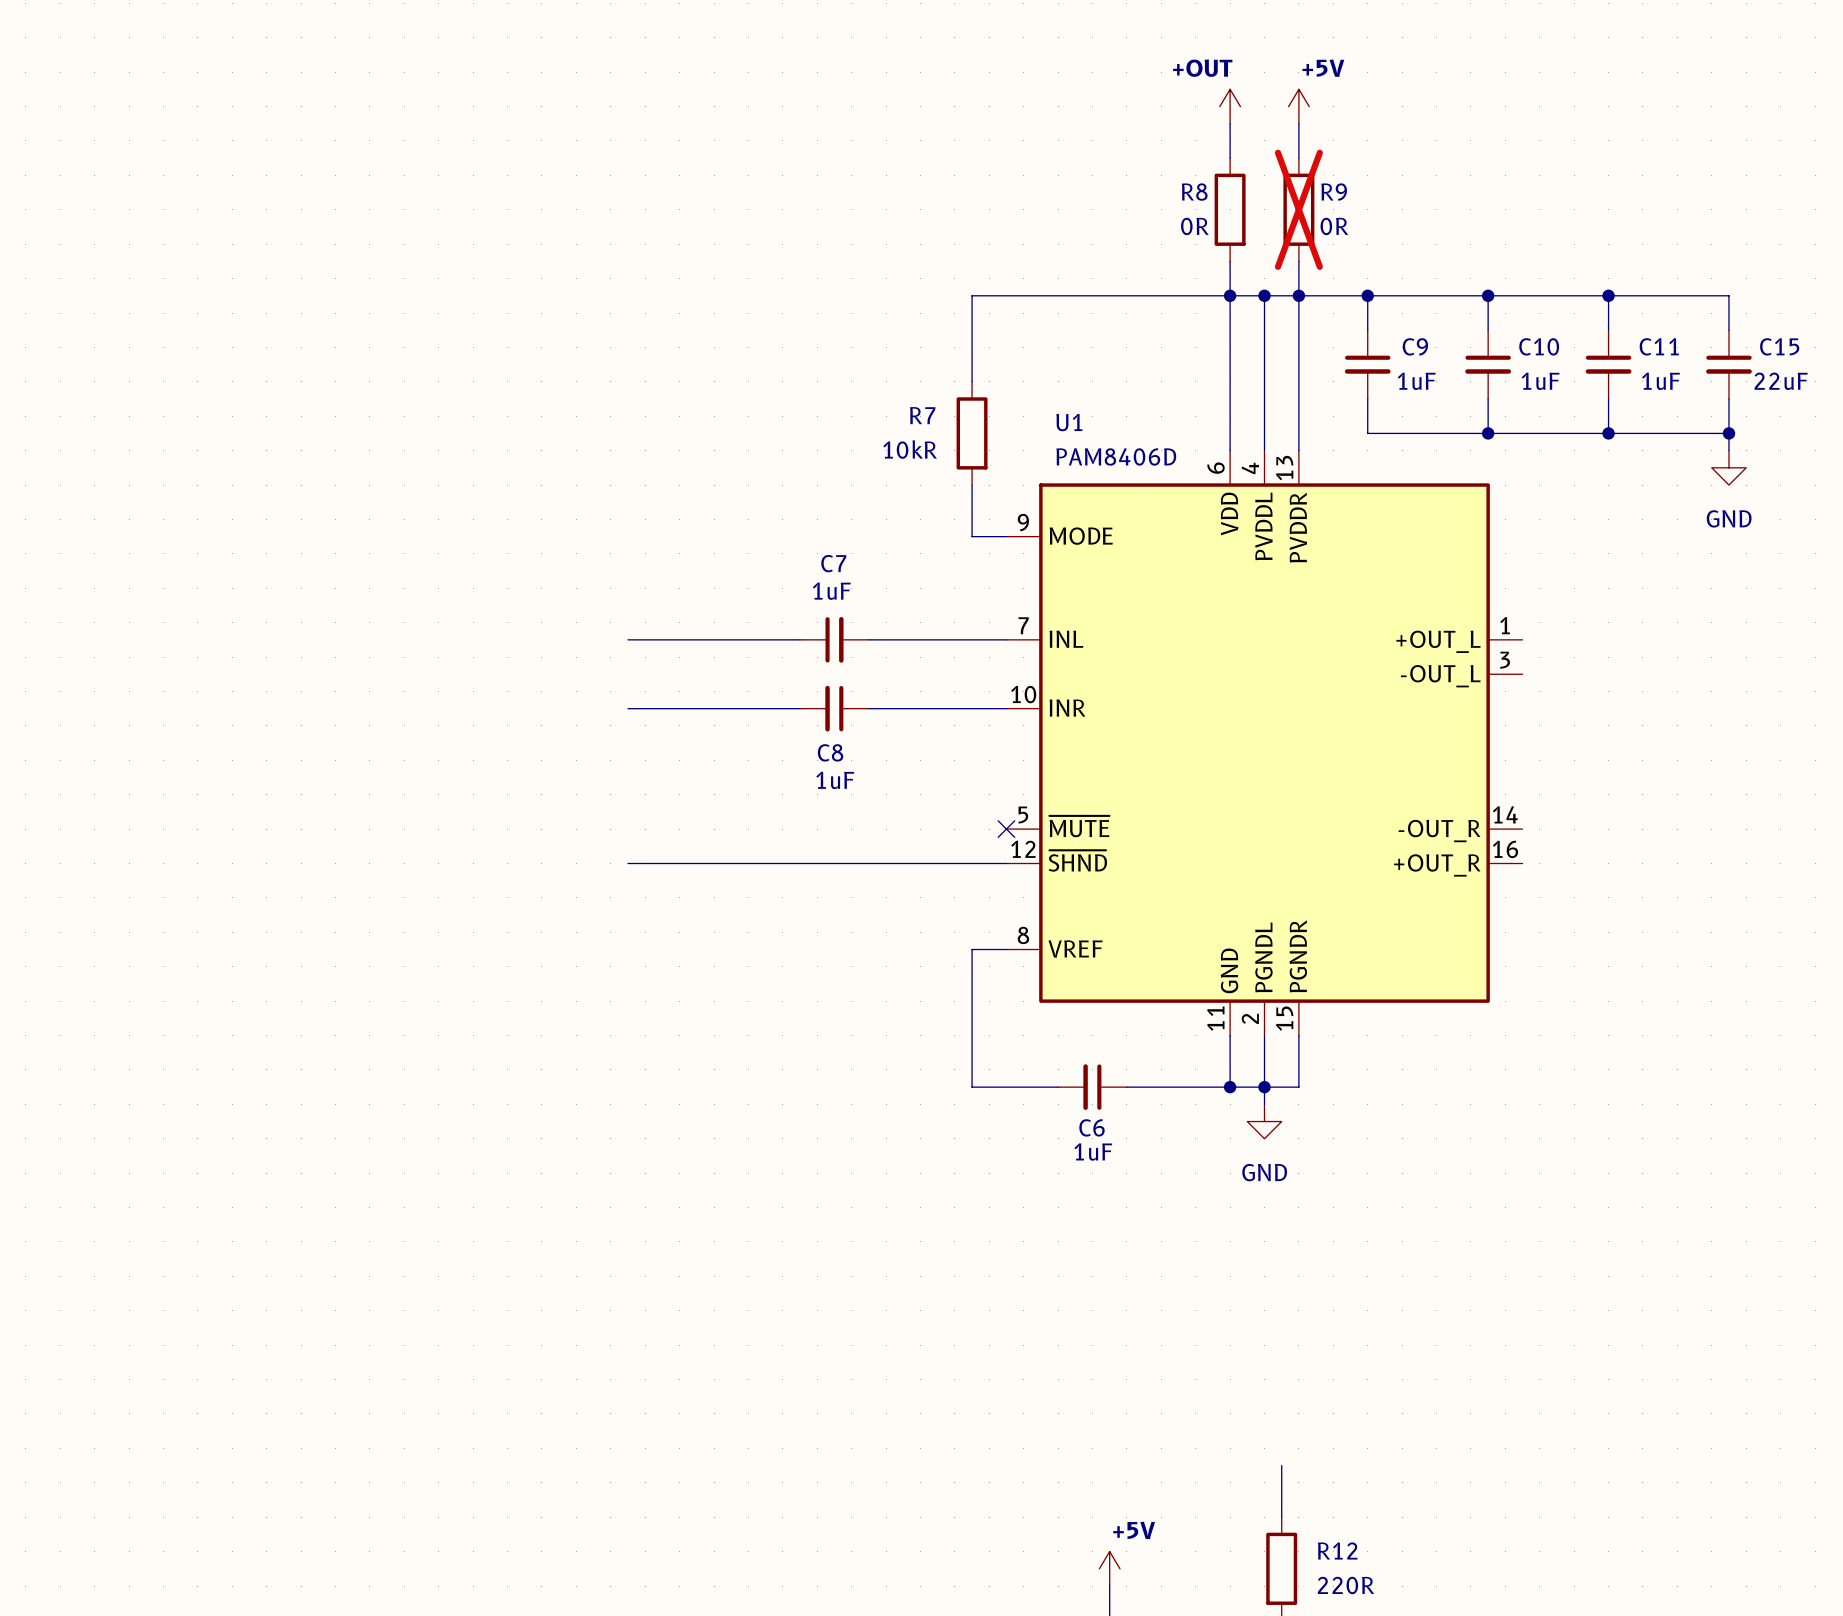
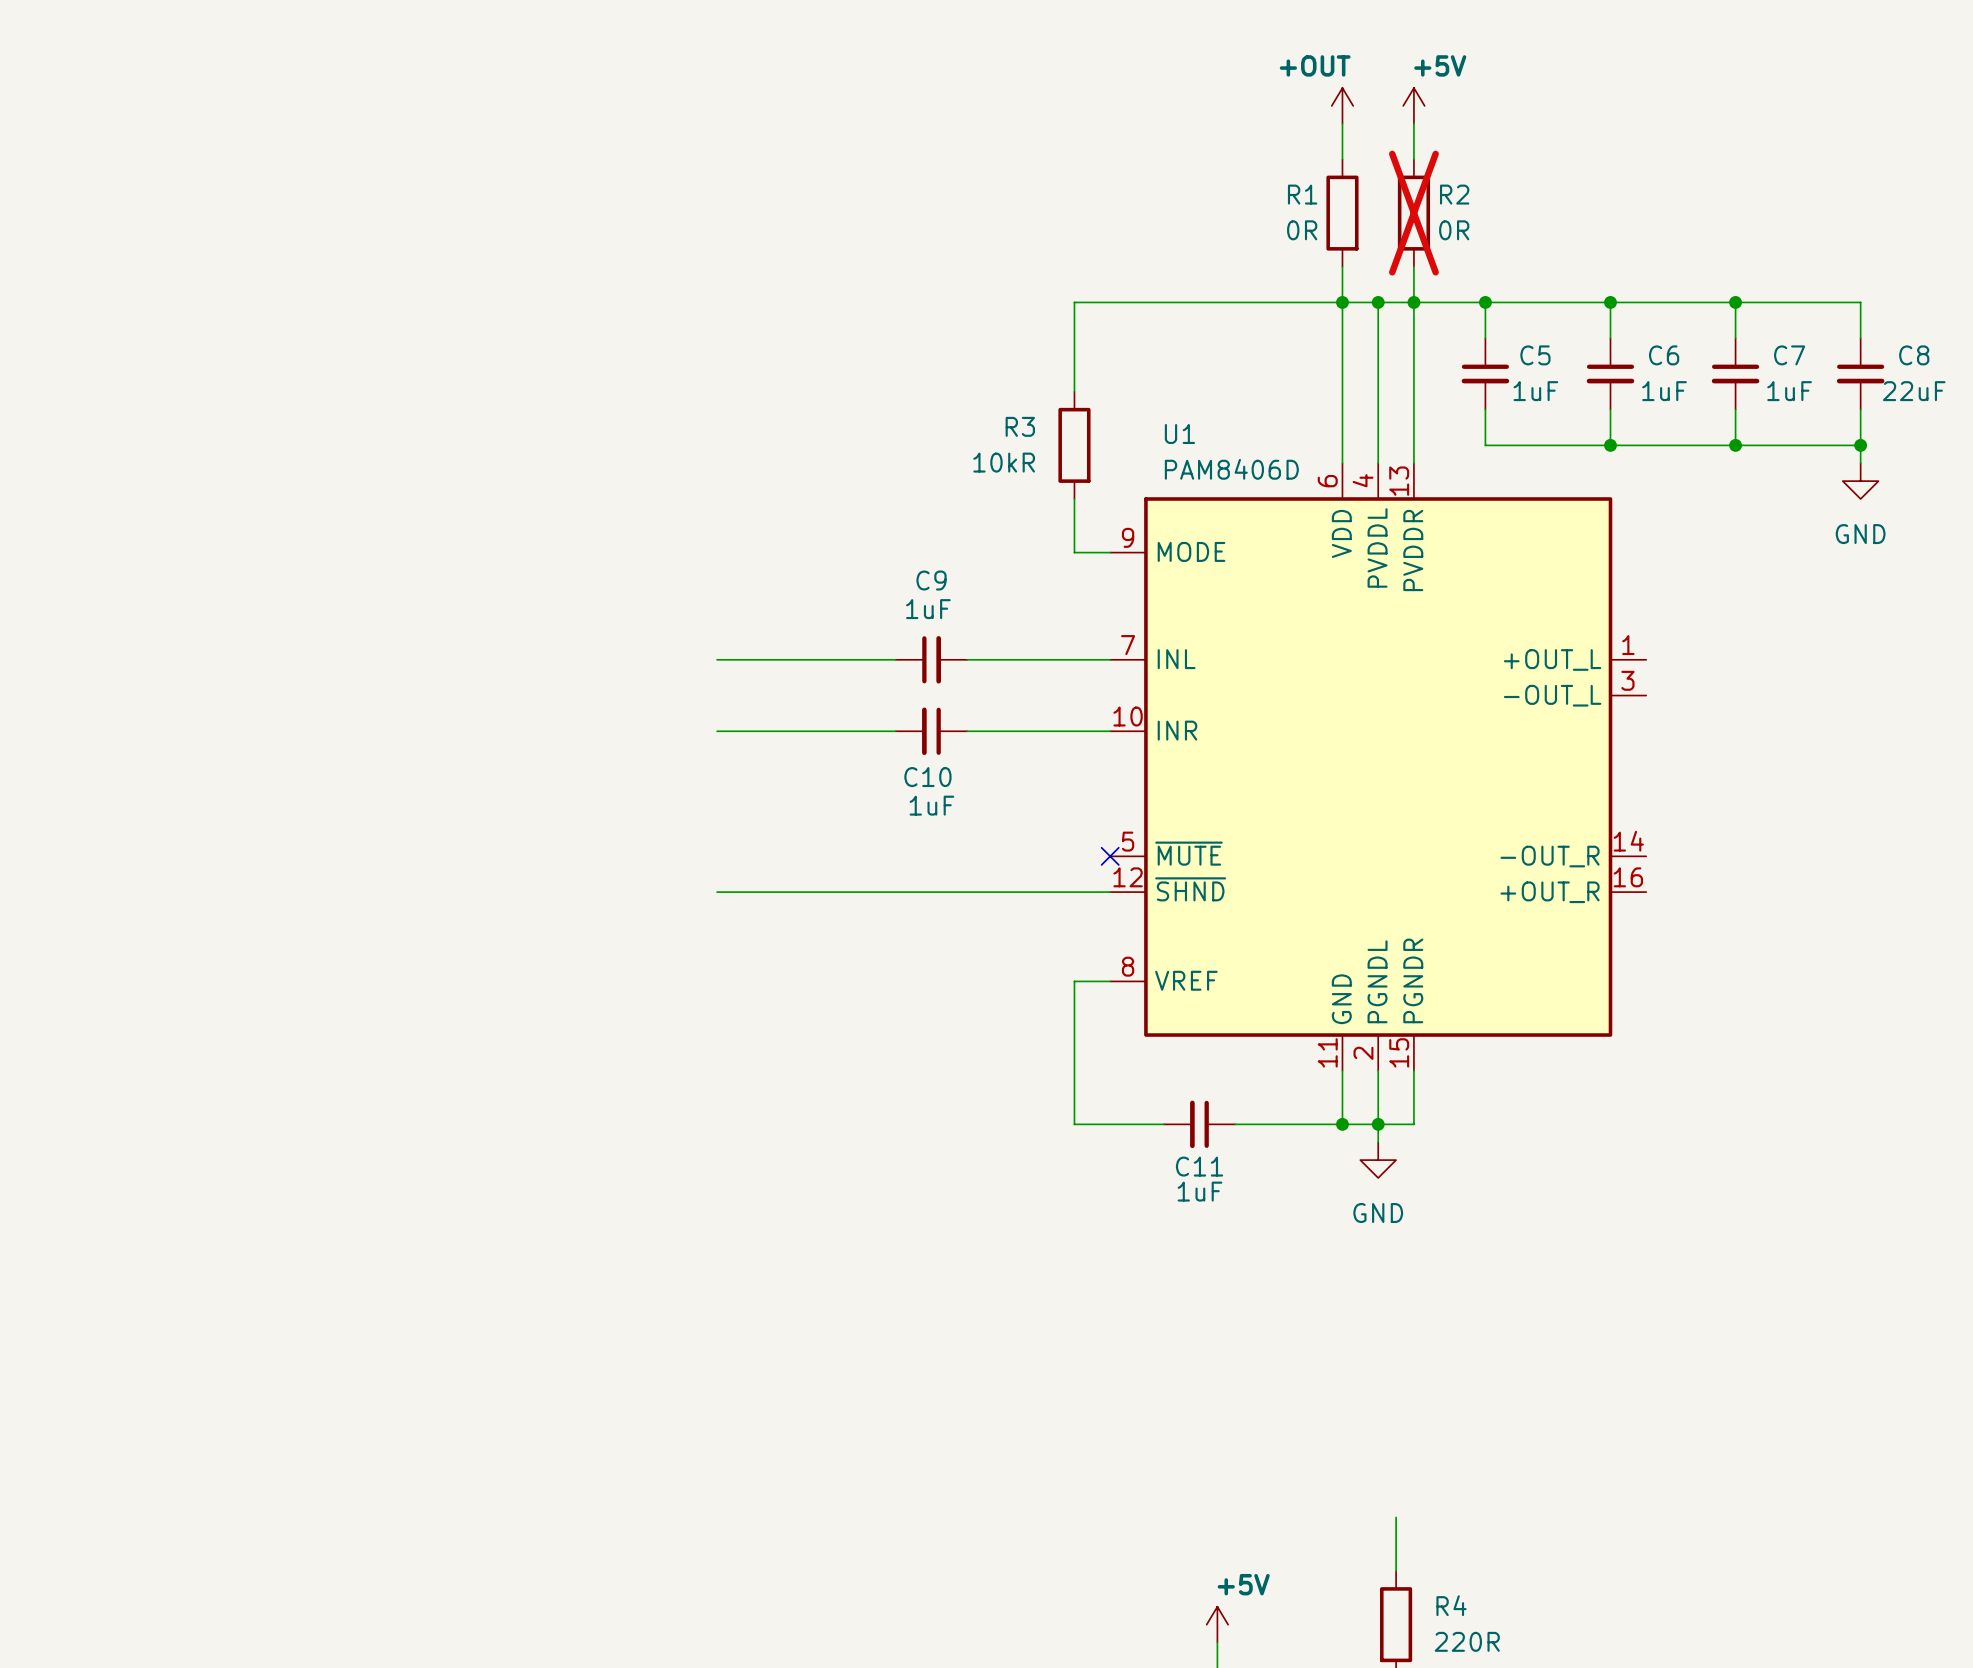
R8 name: R8 (1194, 192) -> R1 (1302, 194)
R9 name: R9 (1334, 192) -> R2 (1454, 194)
C9 name: C9 (1415, 346) -> C5 (1535, 355)
C10 name: C10 (1539, 346) -> C6 (1664, 355)
C11 name: C11 (1659, 346) -> C7 (1789, 355)
C15 name: C15 (1779, 346) -> C8 (1914, 355)
R7 name: R7 (922, 415) -> R3 (1020, 426)
C7 name: C7 (833, 563) -> C9 (931, 580)
C8 name: C8 (830, 752) -> C10 (927, 777)
C6 name: C6 (1091, 1127) -> C11 (1199, 1166)
R12 name: R12 (1337, 1550) -> R4 (1451, 1605)

